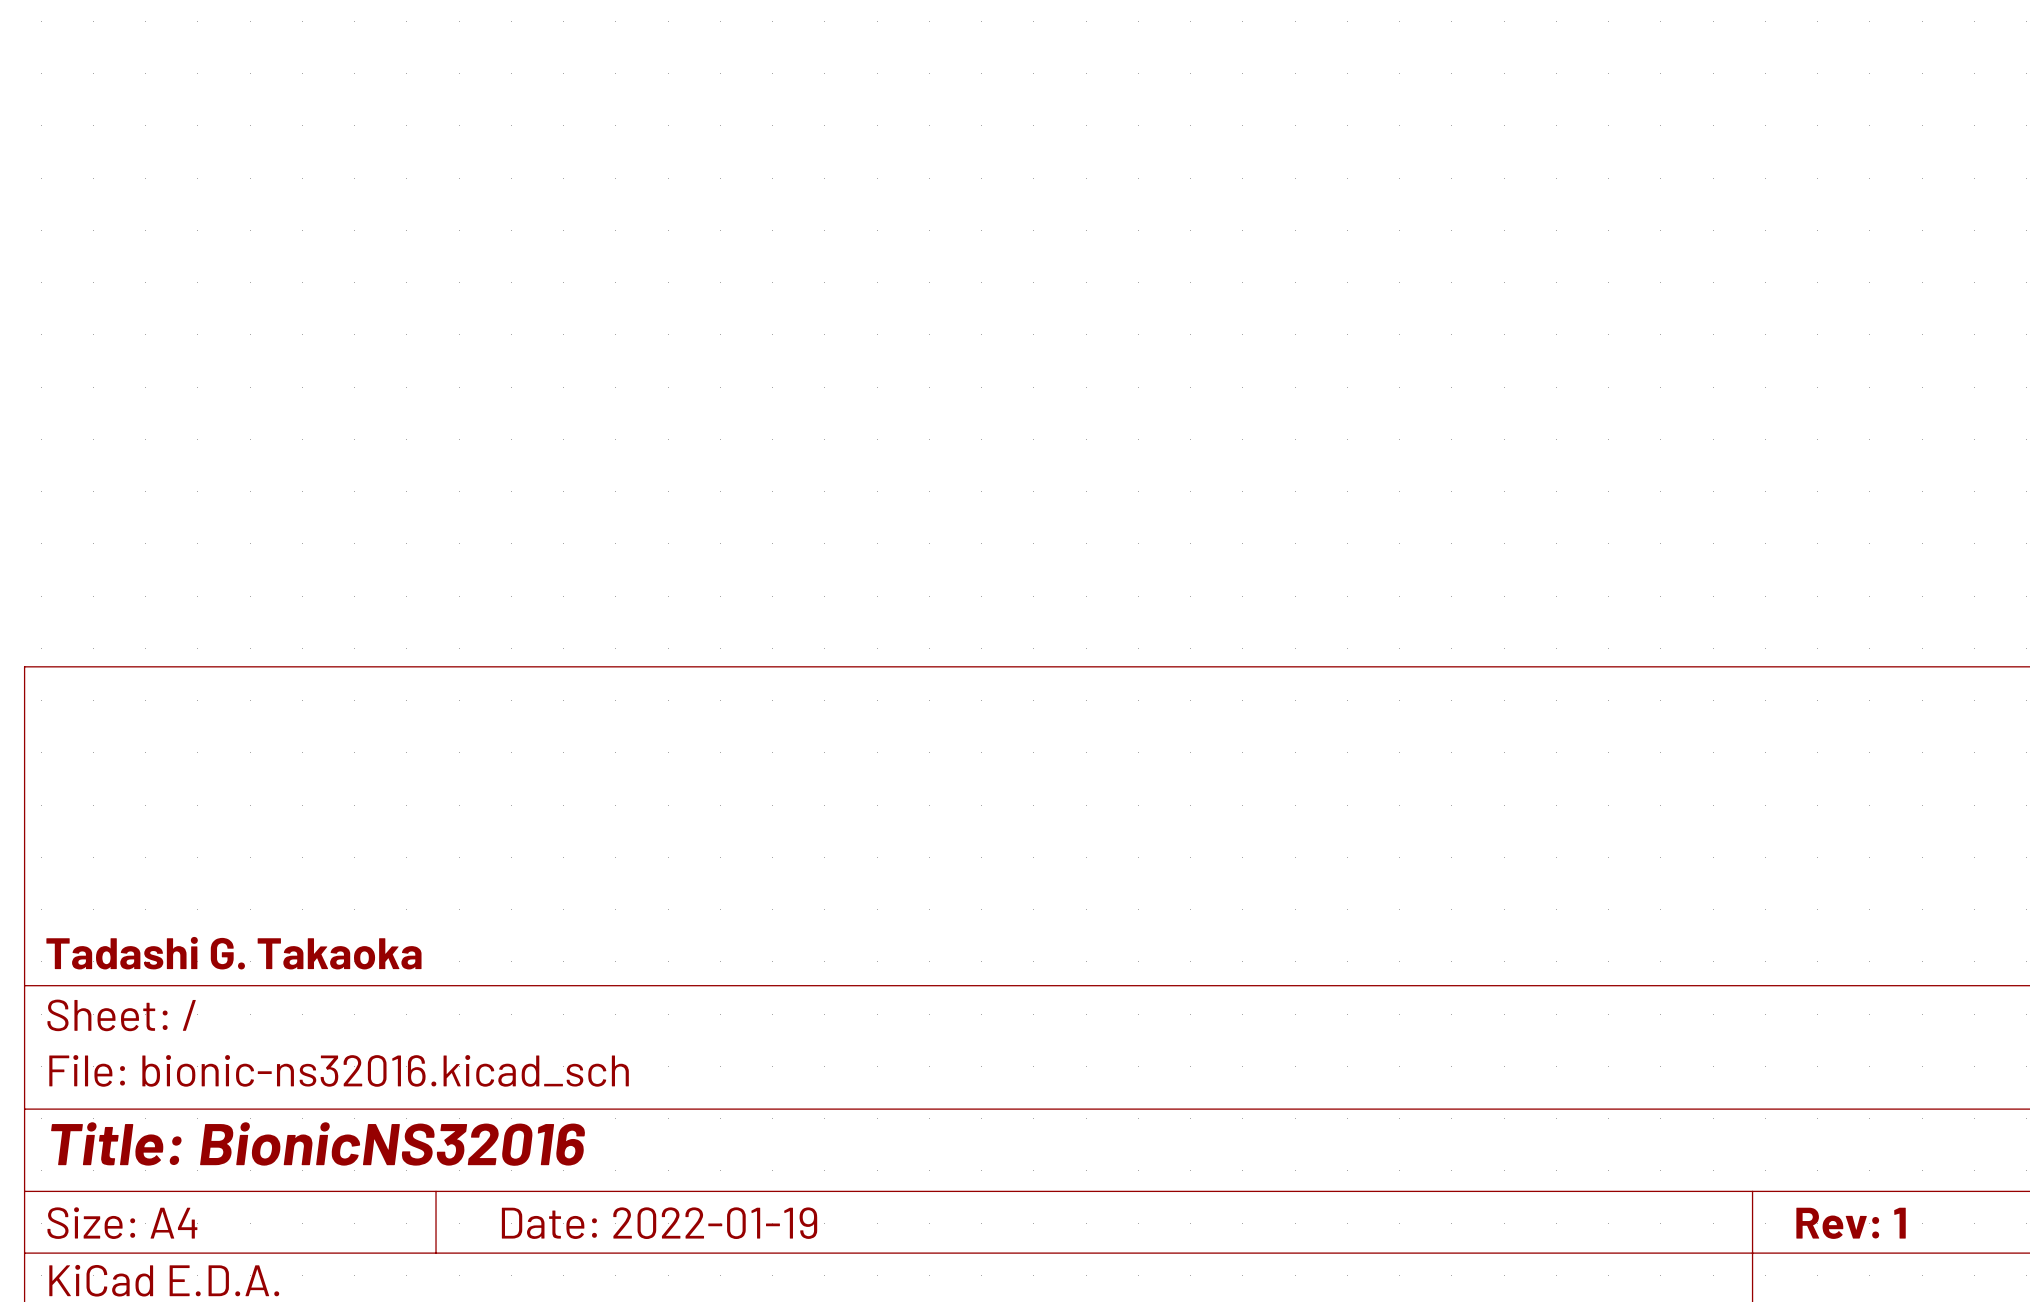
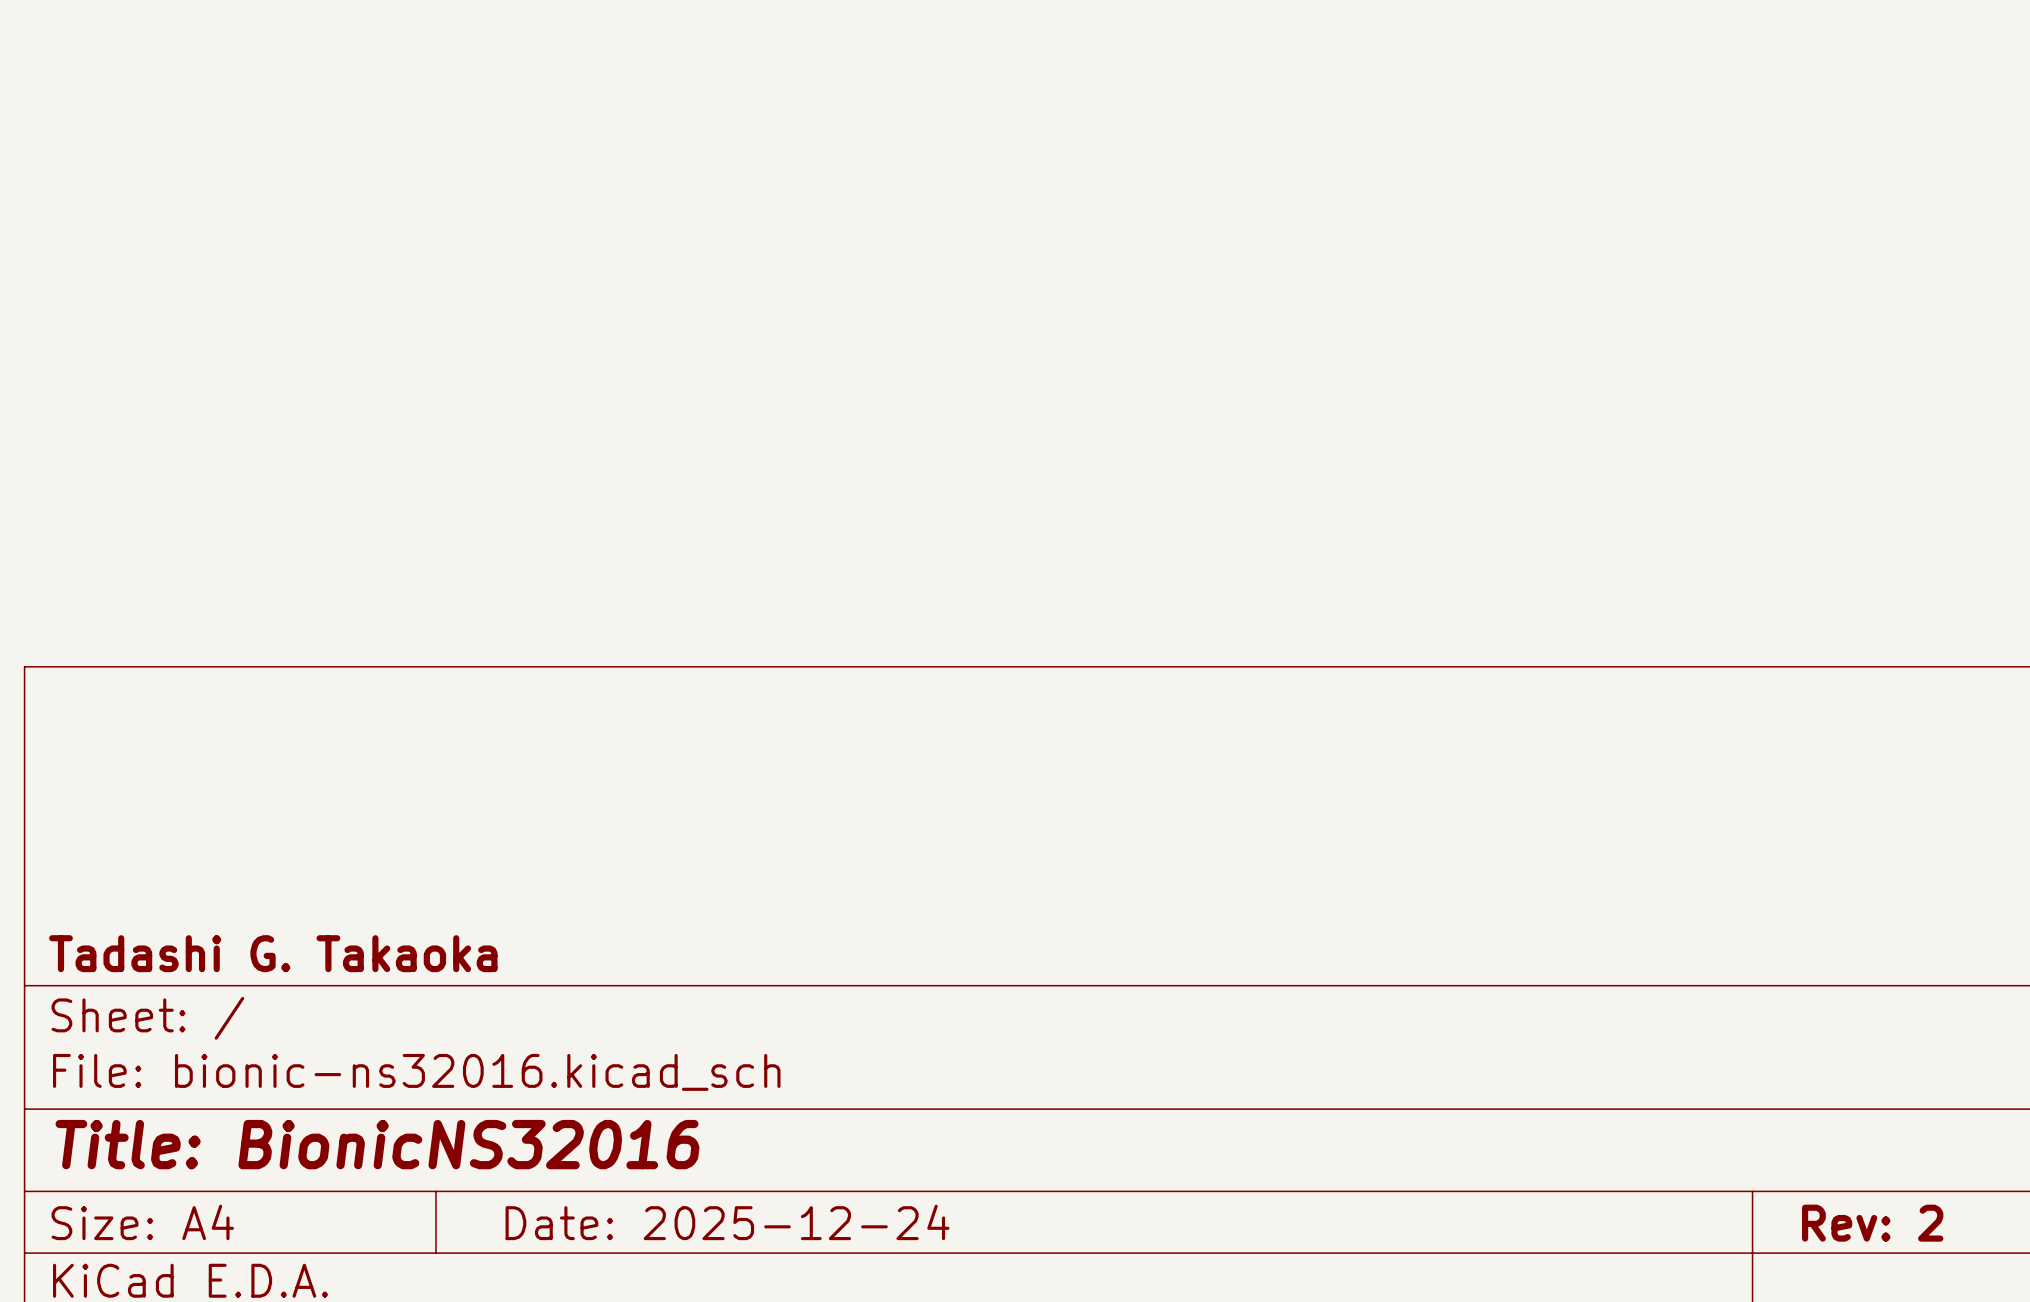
title block: Date: 2022-01-19 (659, 1223) -> Date: 2025-12-24 (727, 1222)
title block: Rev: 1 (1851, 1223) -> Rev: 2 (1872, 1223)

